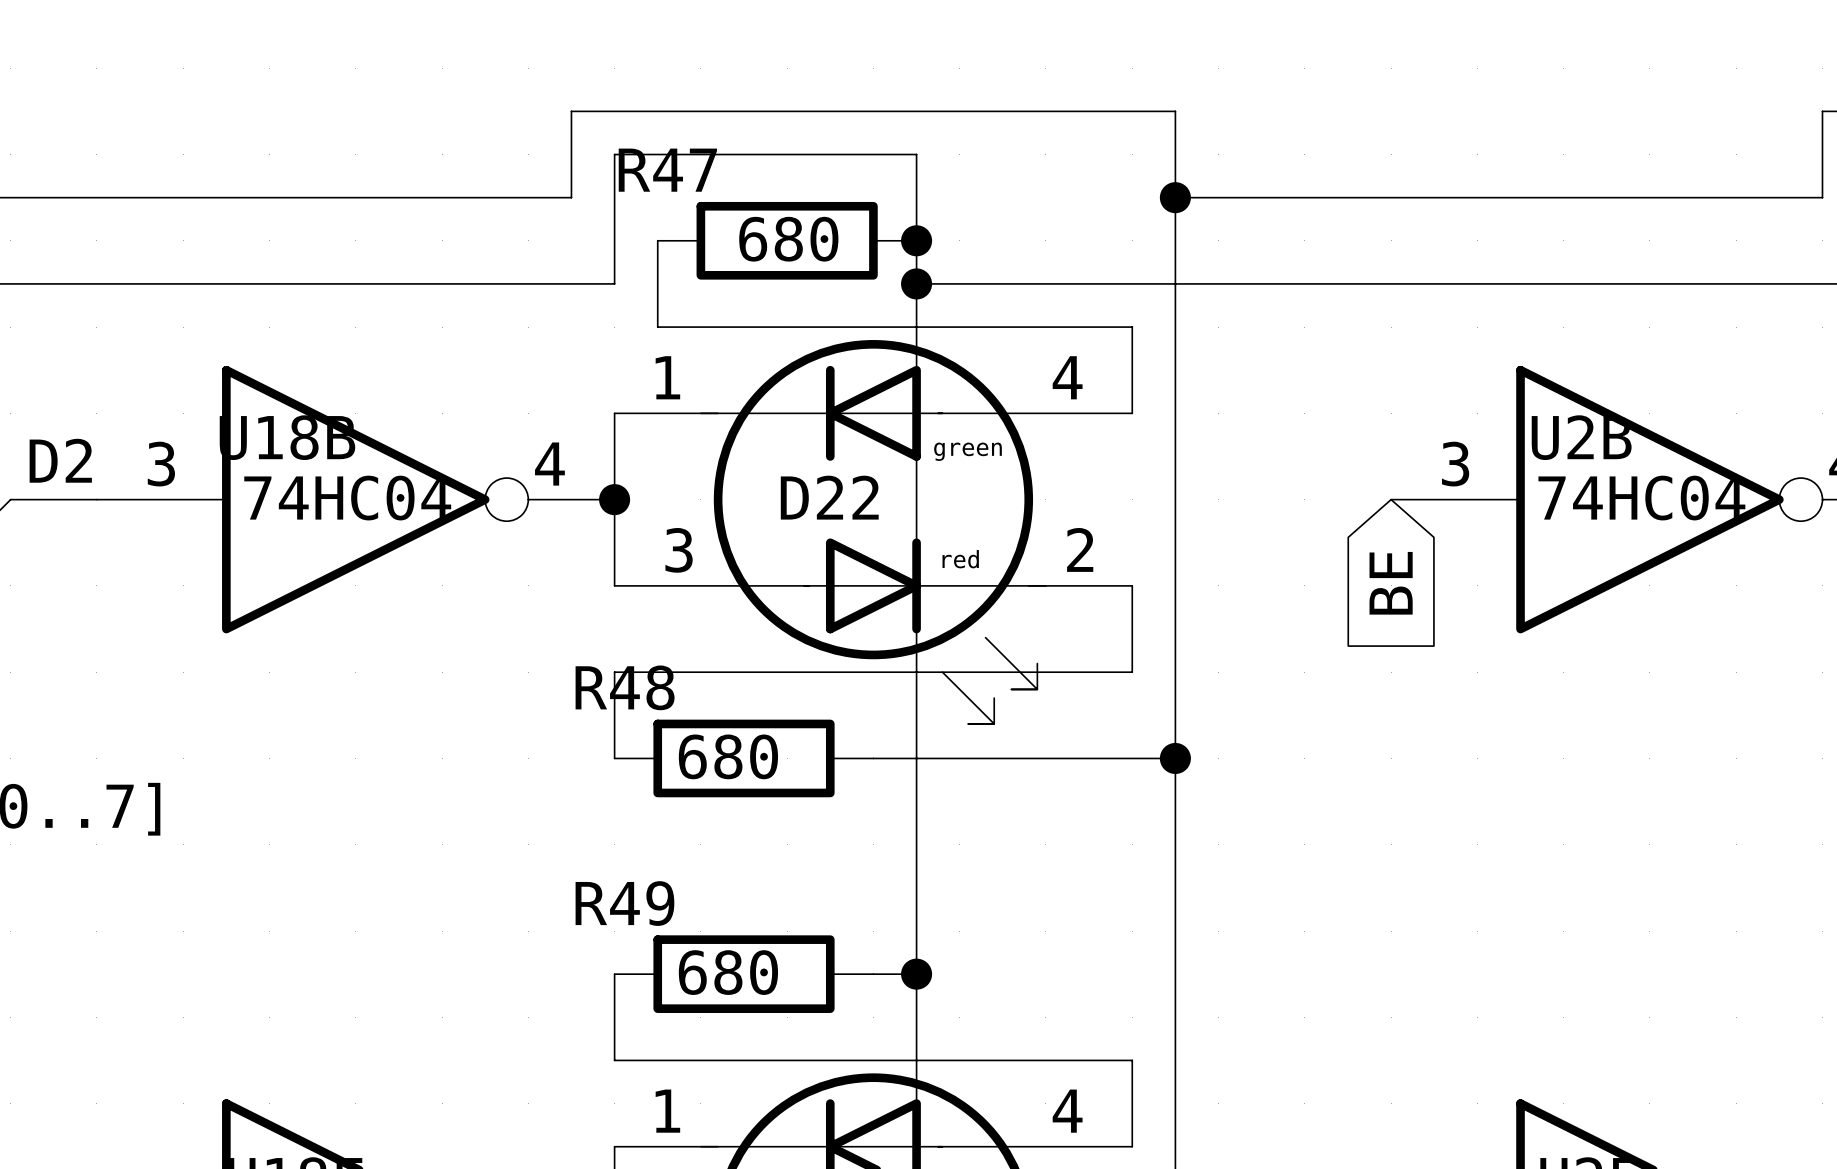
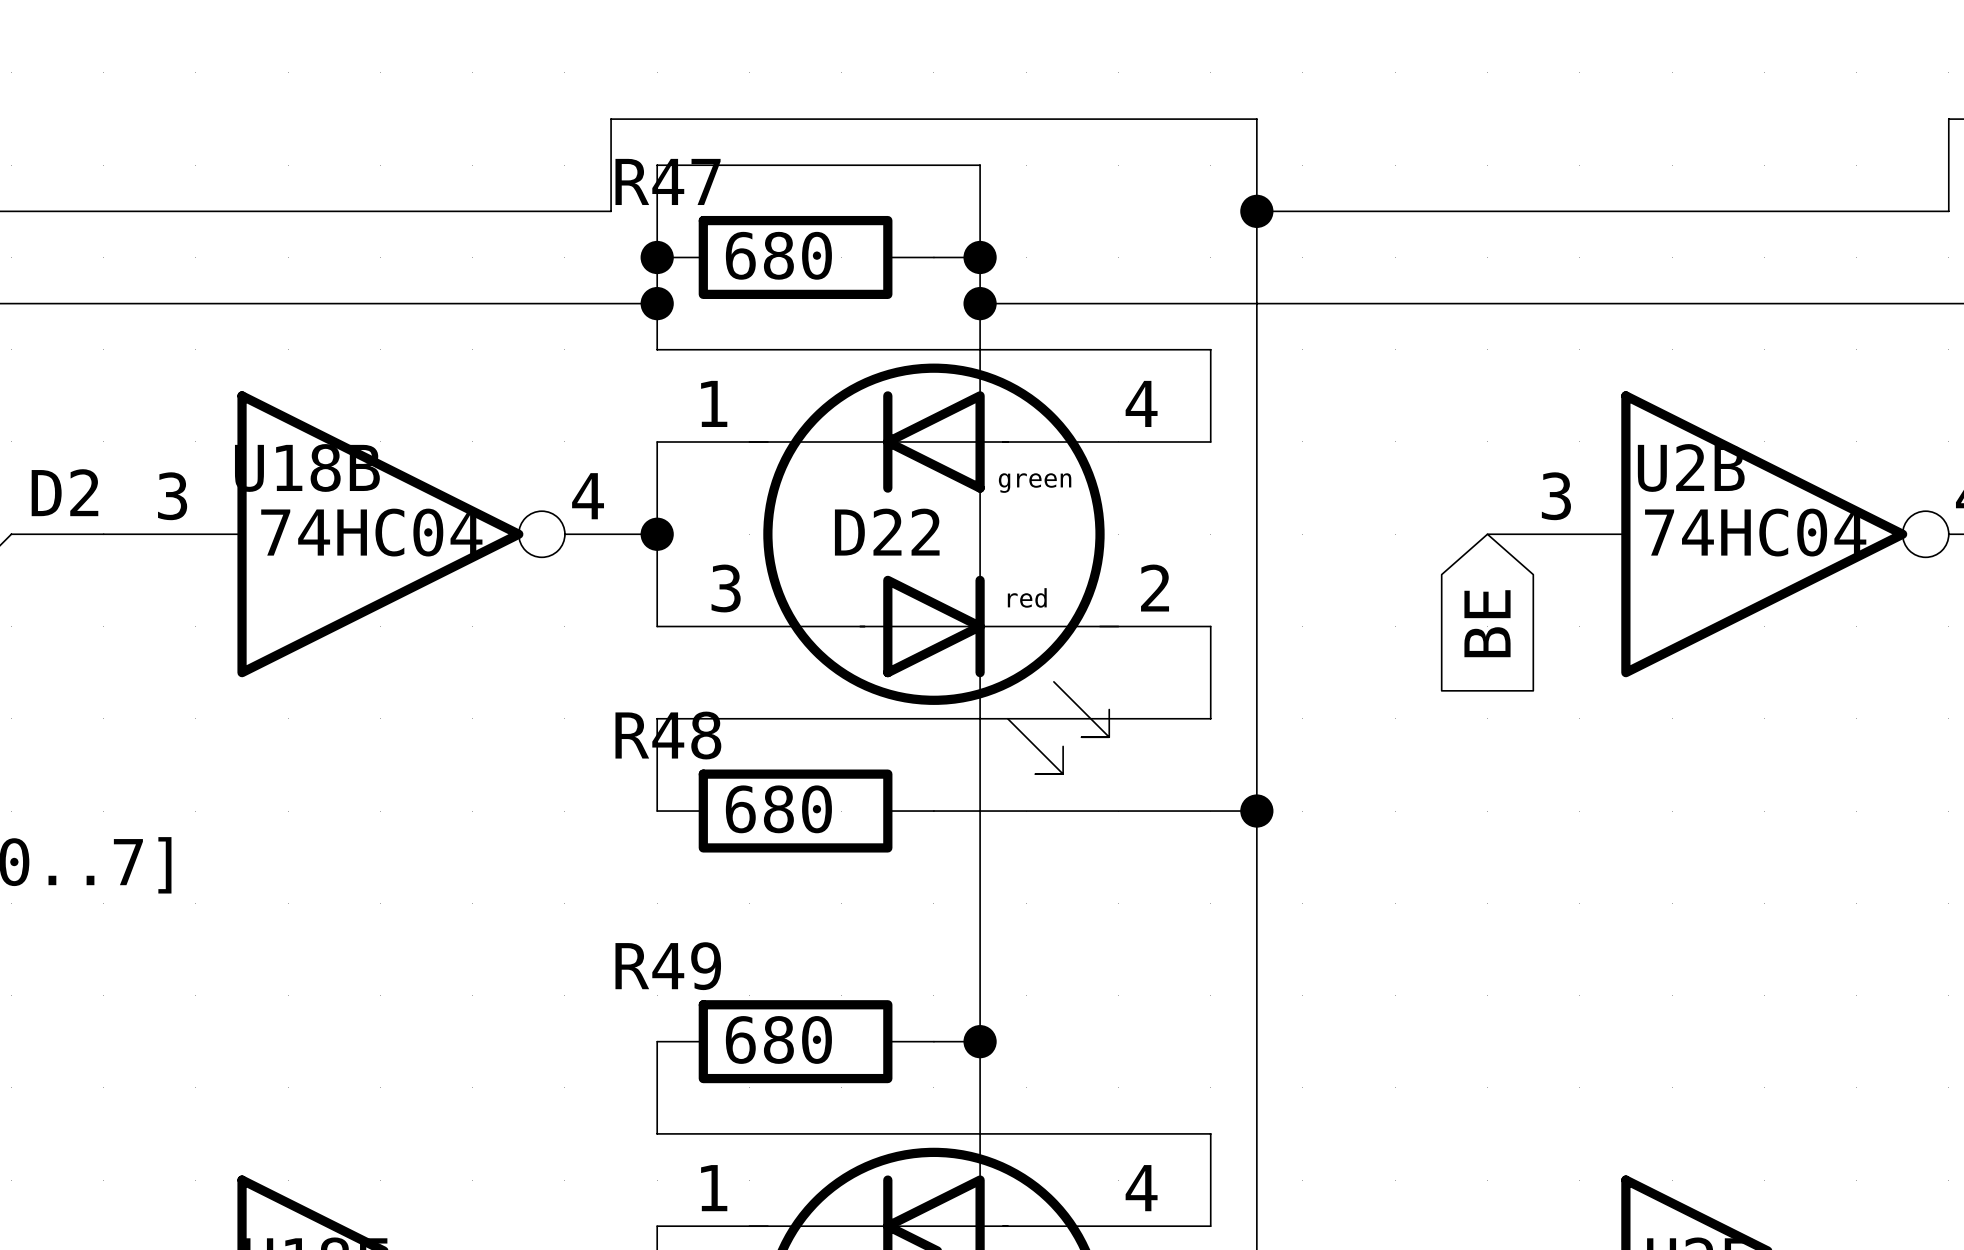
R47 value position: 680 (788, 239) -> 680 (778, 255)
junction: none -> (657, 257)
wire: (657, 240) (657, 327) -> (657, 303) (657, 349) (703, 349)
R47 position: (787, 240) -> (795, 257)
junction: none -> (657, 303)

